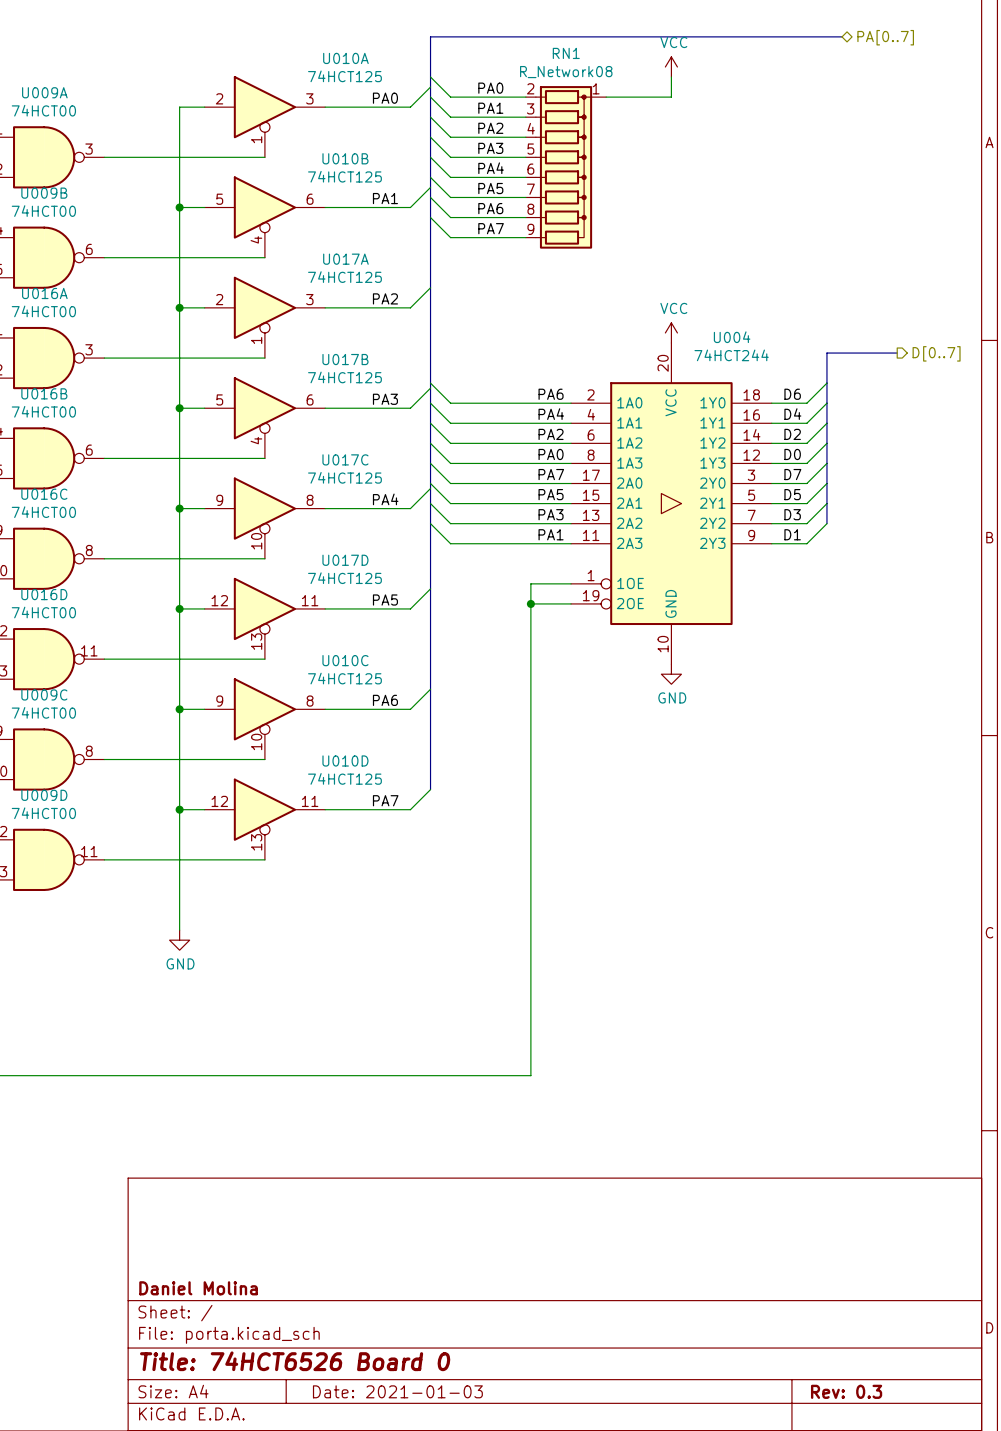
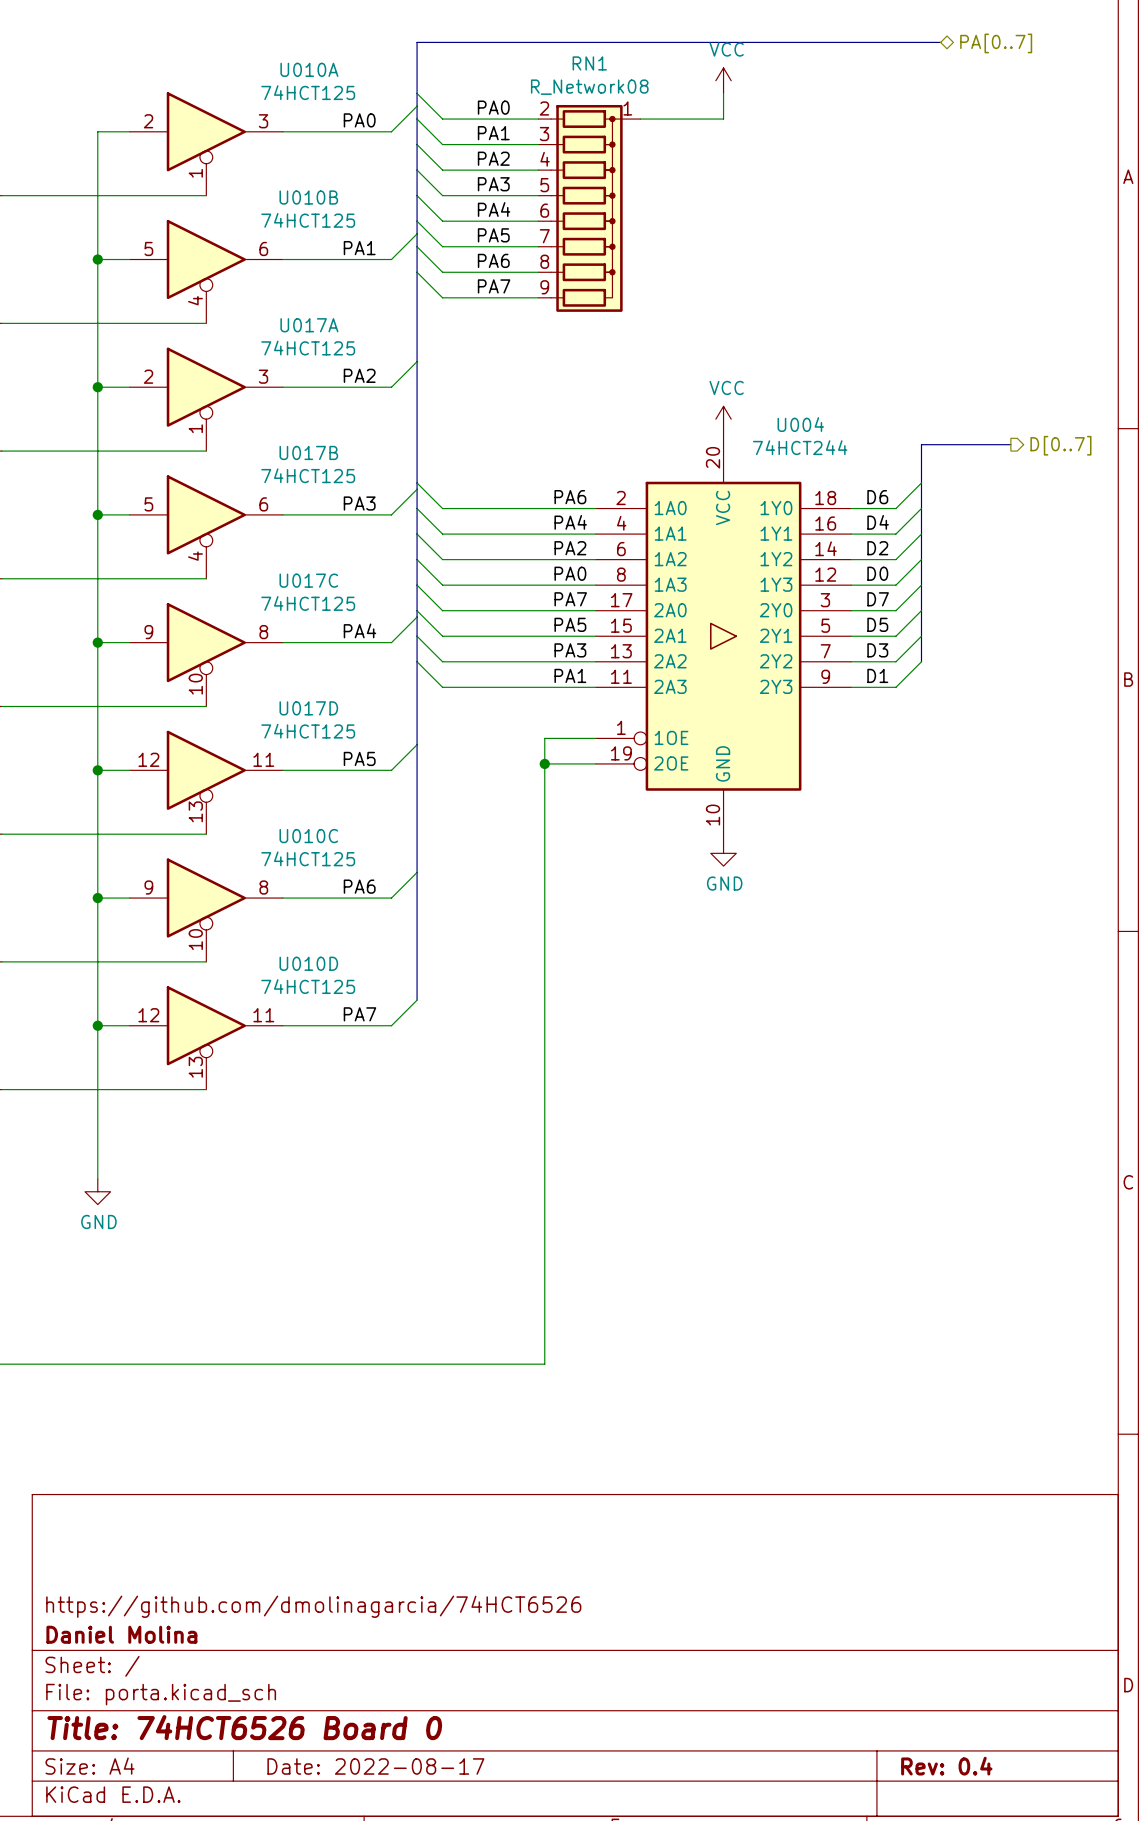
title block: none -> https://github.com/dmolinagarcia/74HCT6526 (313, 1606)
title block: Date: 2021-01-03 (397, 1391) -> Date: 2022-08-17 (375, 1766)
title block: Rev: 0.3 (846, 1391) -> Rev: 0.4 (946, 1766)

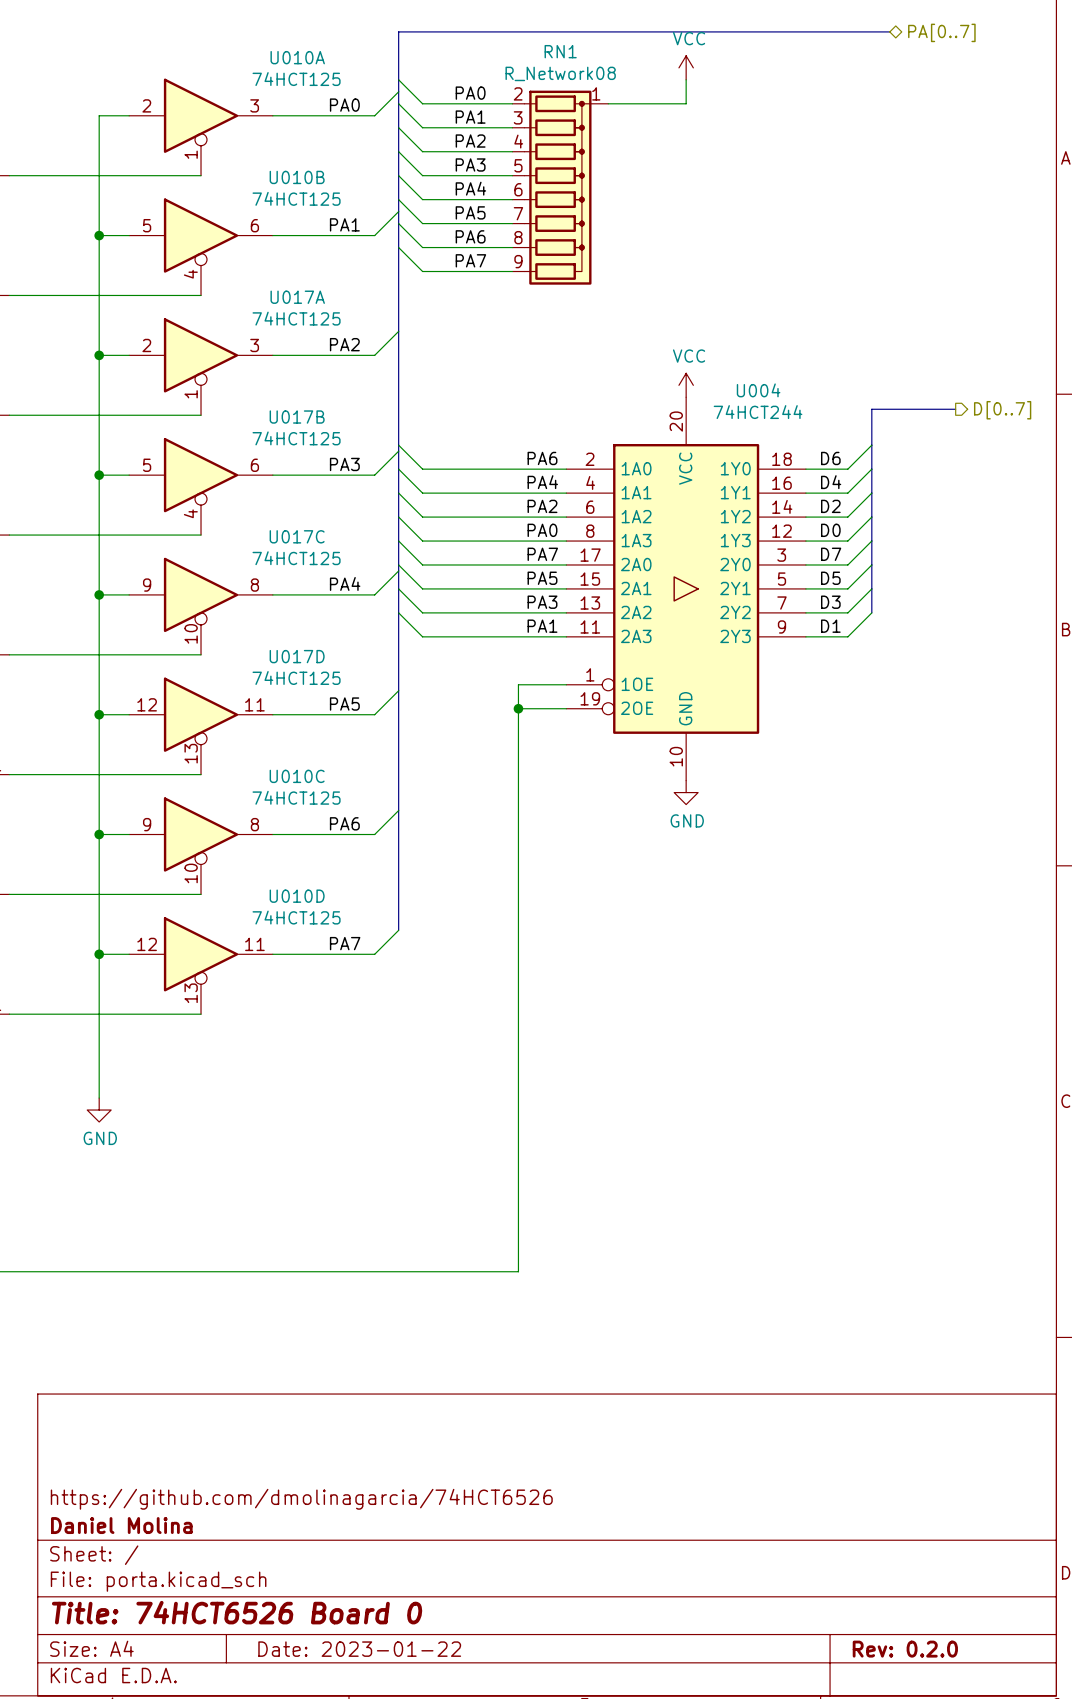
title block: Date: 2022-08-17 (375, 1766) -> Date: 2023-01-22 (359, 1649)
title block: Rev: 0.4 (946, 1766) -> Rev: 0.2.0 (905, 1649)

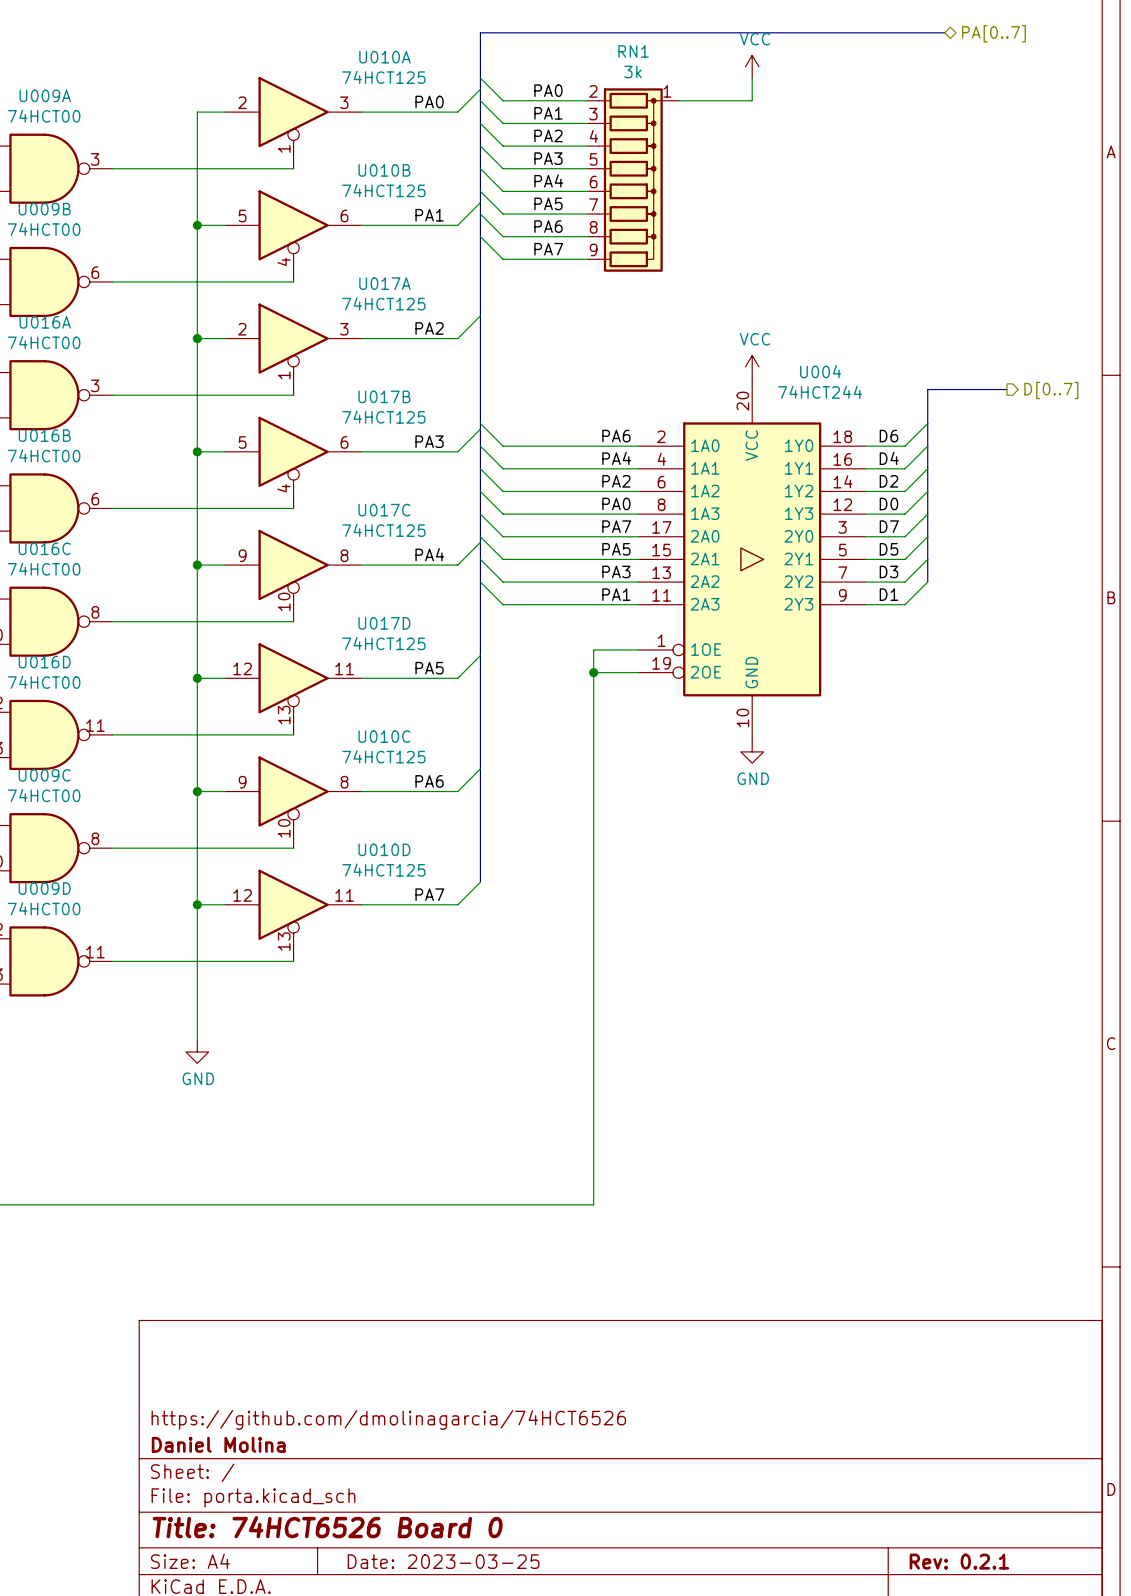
RN1 value: R_Network08 (560, 73) -> 3k (633, 71)
title block: Date: 2023-01-22 (359, 1649) -> Date: 2023-03-25 (443, 1561)
title block: Rev: 0.2.0 (905, 1649) -> Rev: 0.2.1 (959, 1561)

